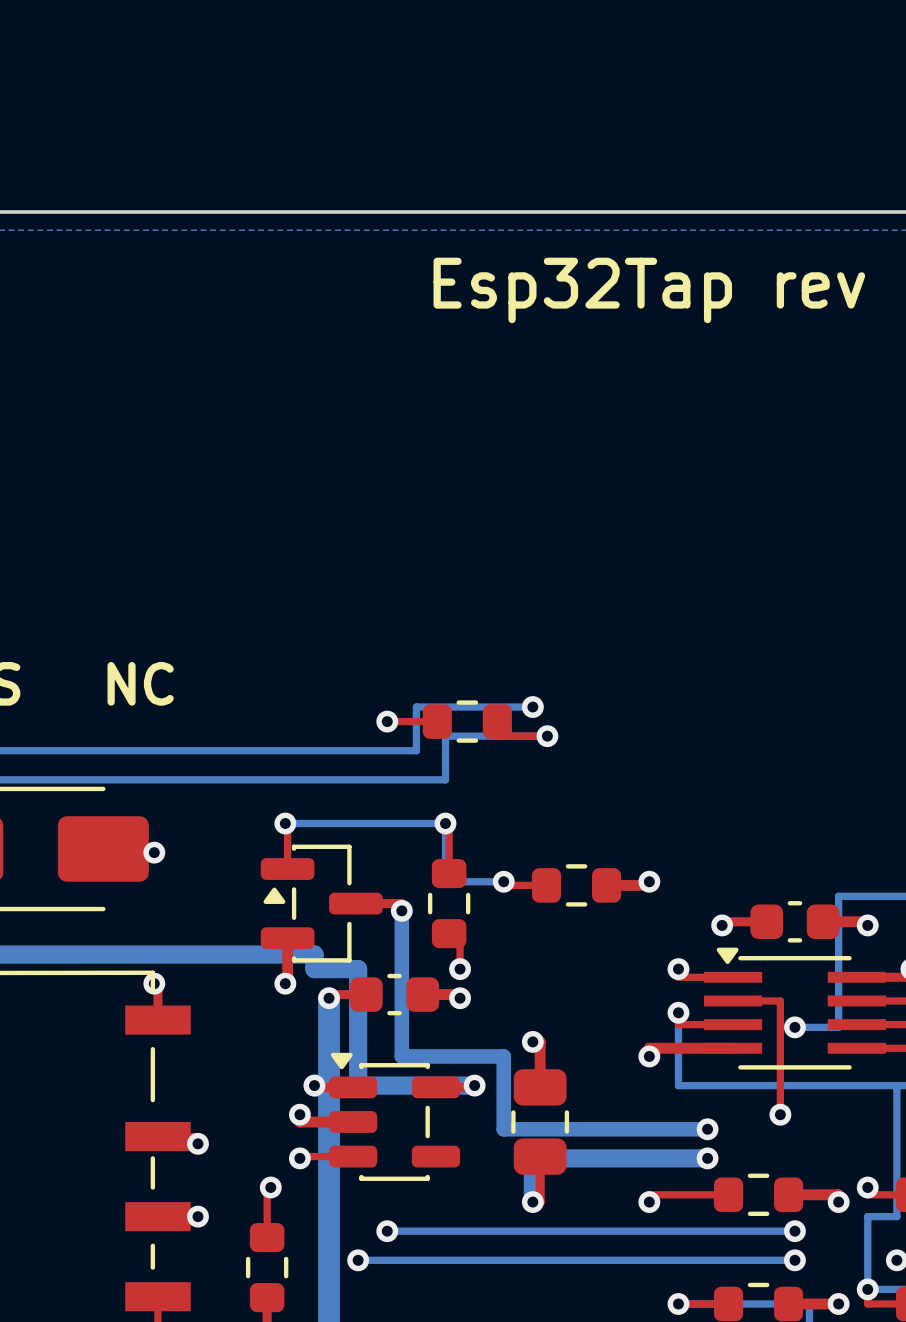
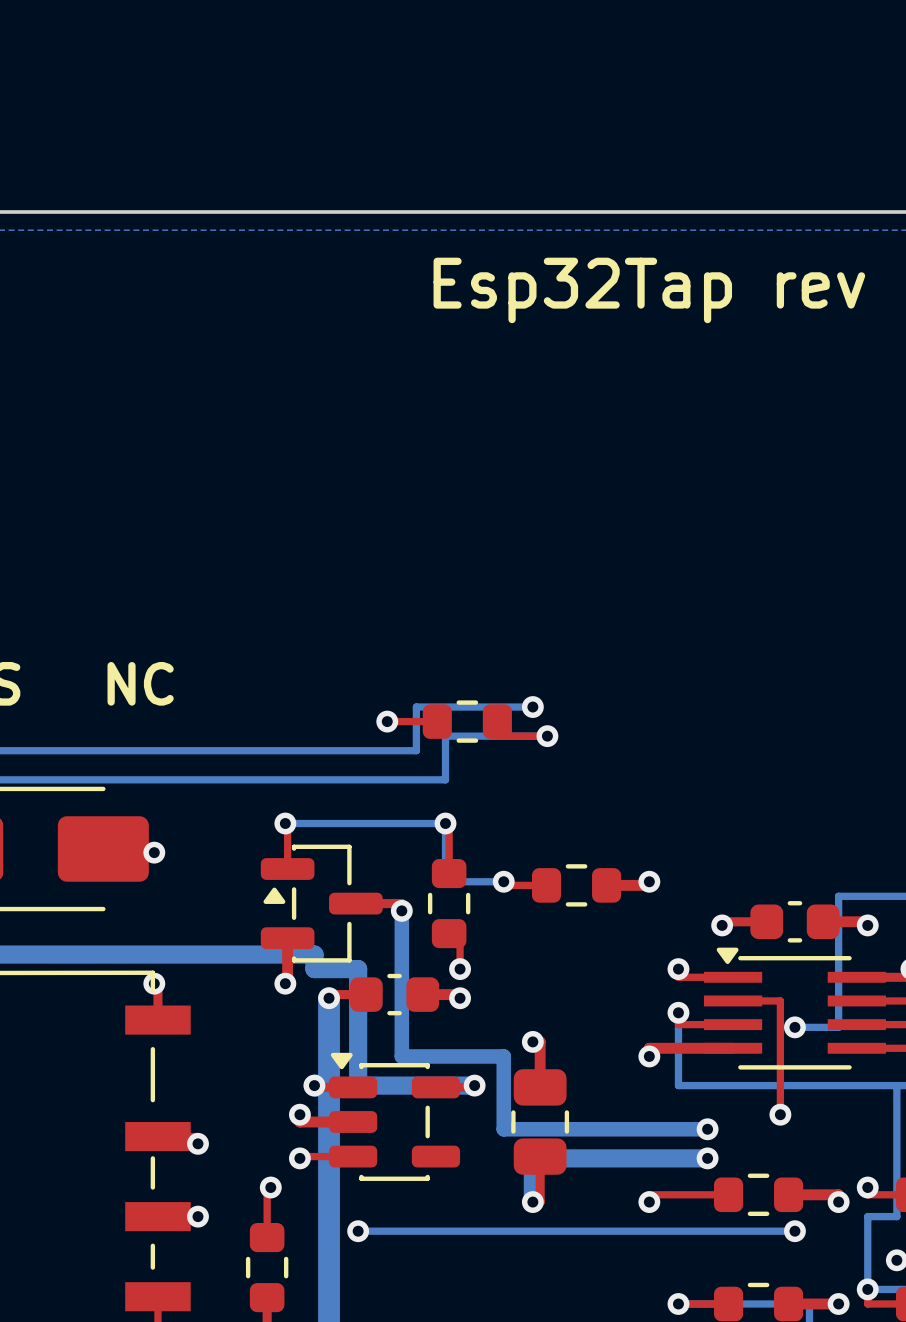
bottom track: none -> (358, 1231) (387, 1231)
via: none -> (358, 1231)
via: (387, 1231) -> none
bottom track: (358, 1260) (794, 1260) -> none
via: (358, 1260) -> none
via: (794, 1260) -> none

